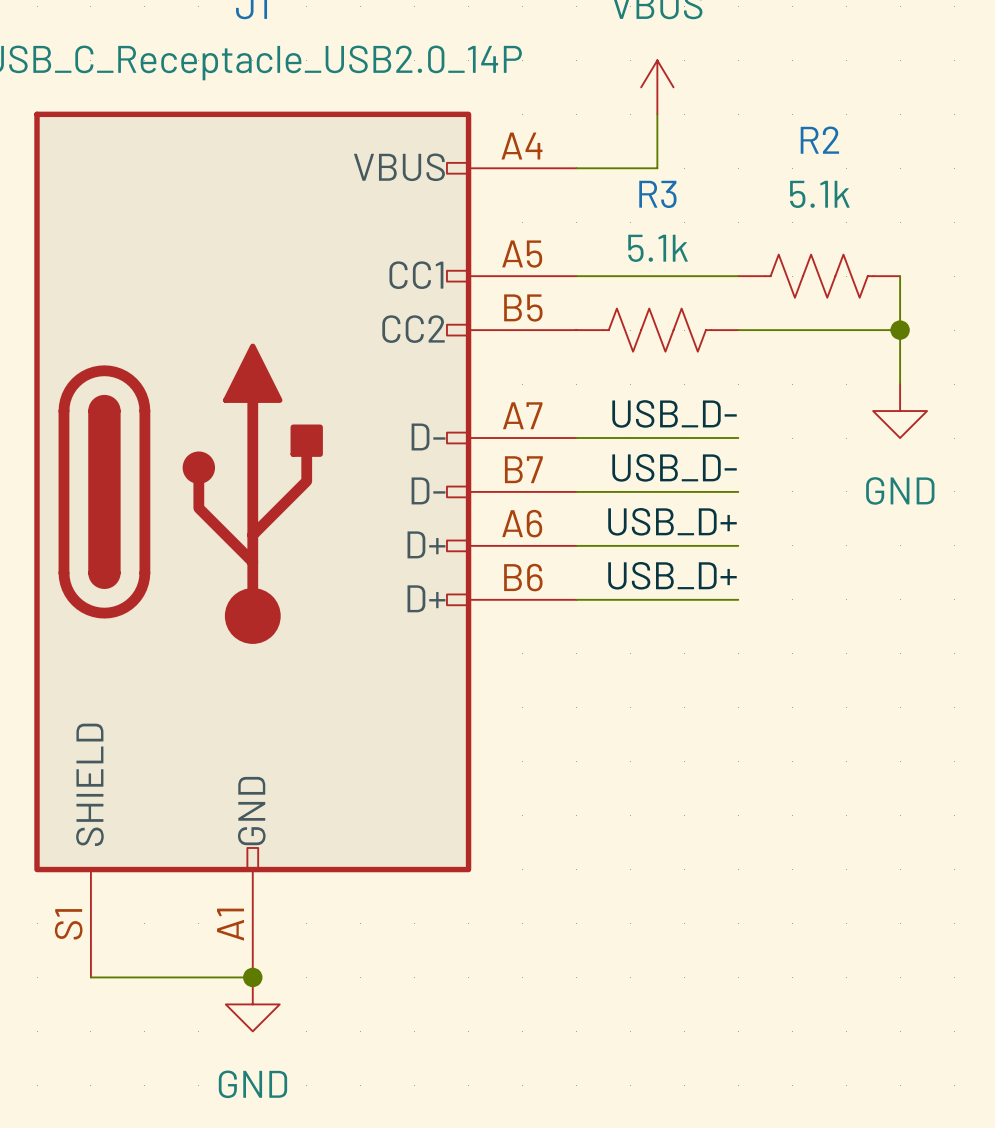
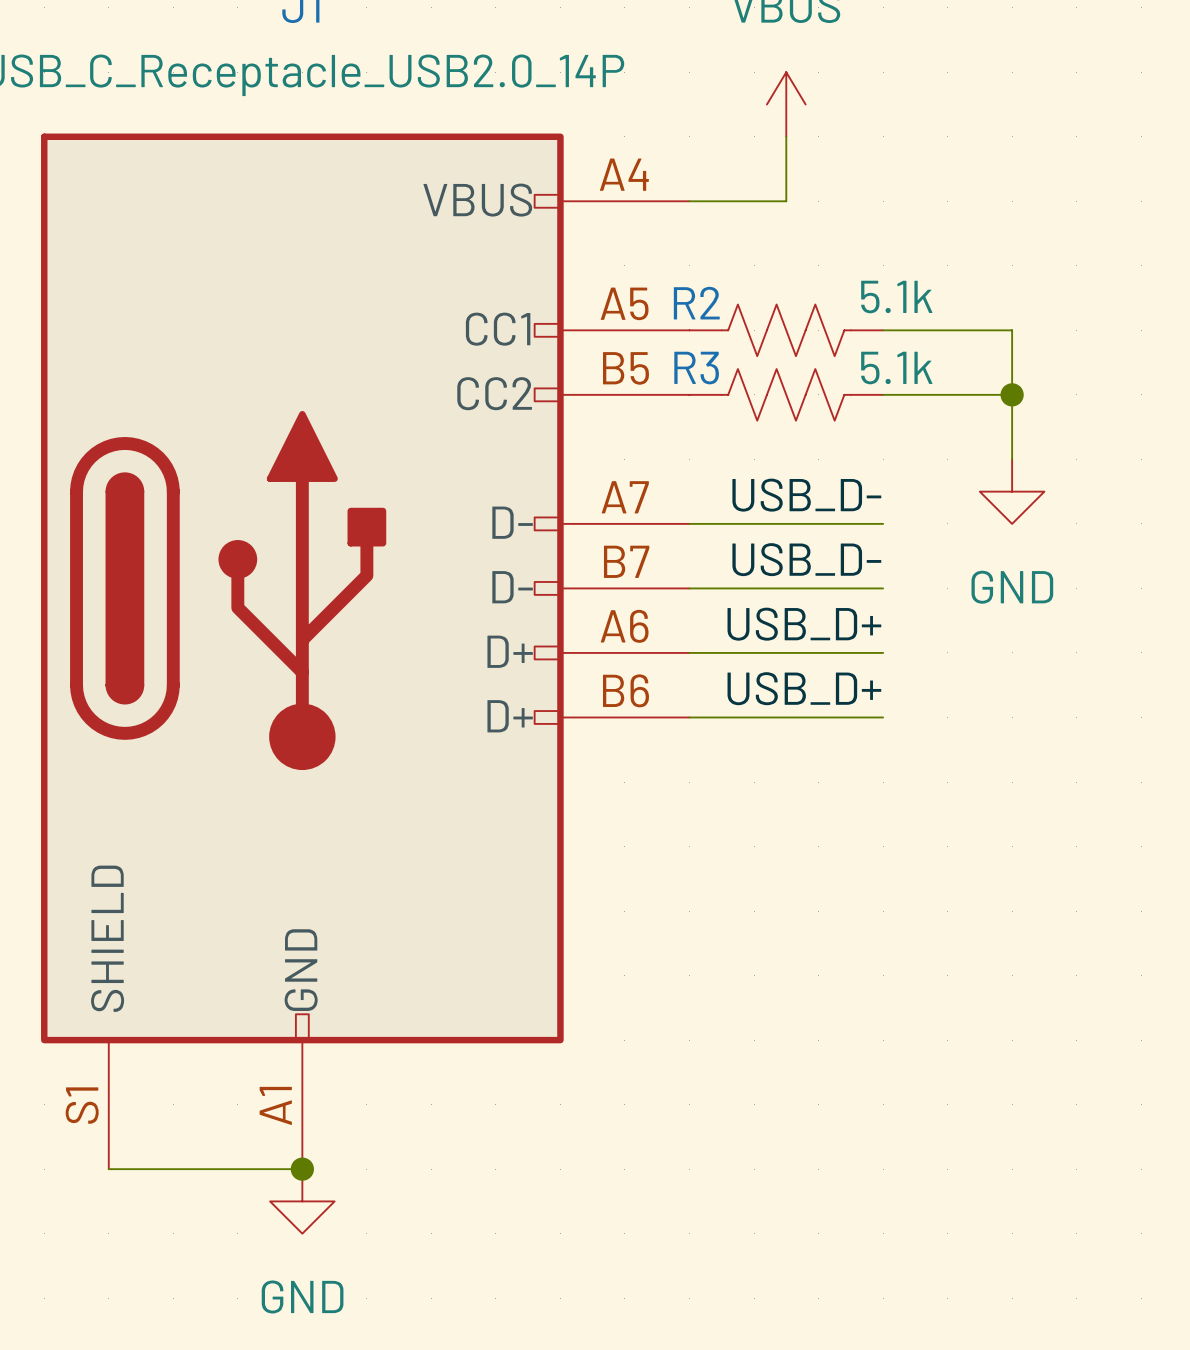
R2 name position: R2 (819, 140) -> R2 (696, 303)
R3 name position: R3 (657, 194) -> R3 (696, 368)
R2 value position: 5.1k (819, 194) -> 5.1k (896, 297)
R3 value position: 5.1k (658, 248) -> 5.1k (896, 368)
wire: (576, 276) (738, 276) -> (1012, 459) (1012, 330) (883, 330)
R2 position: (819, 276) -> (786, 330)
wire: (900, 276) (900, 384) -> none
wire: (846, 330) (900, 330) -> none
junction position: (900, 330) -> (1012, 394)
power symbol position: GND (900, 411) -> GND (1012, 491)

